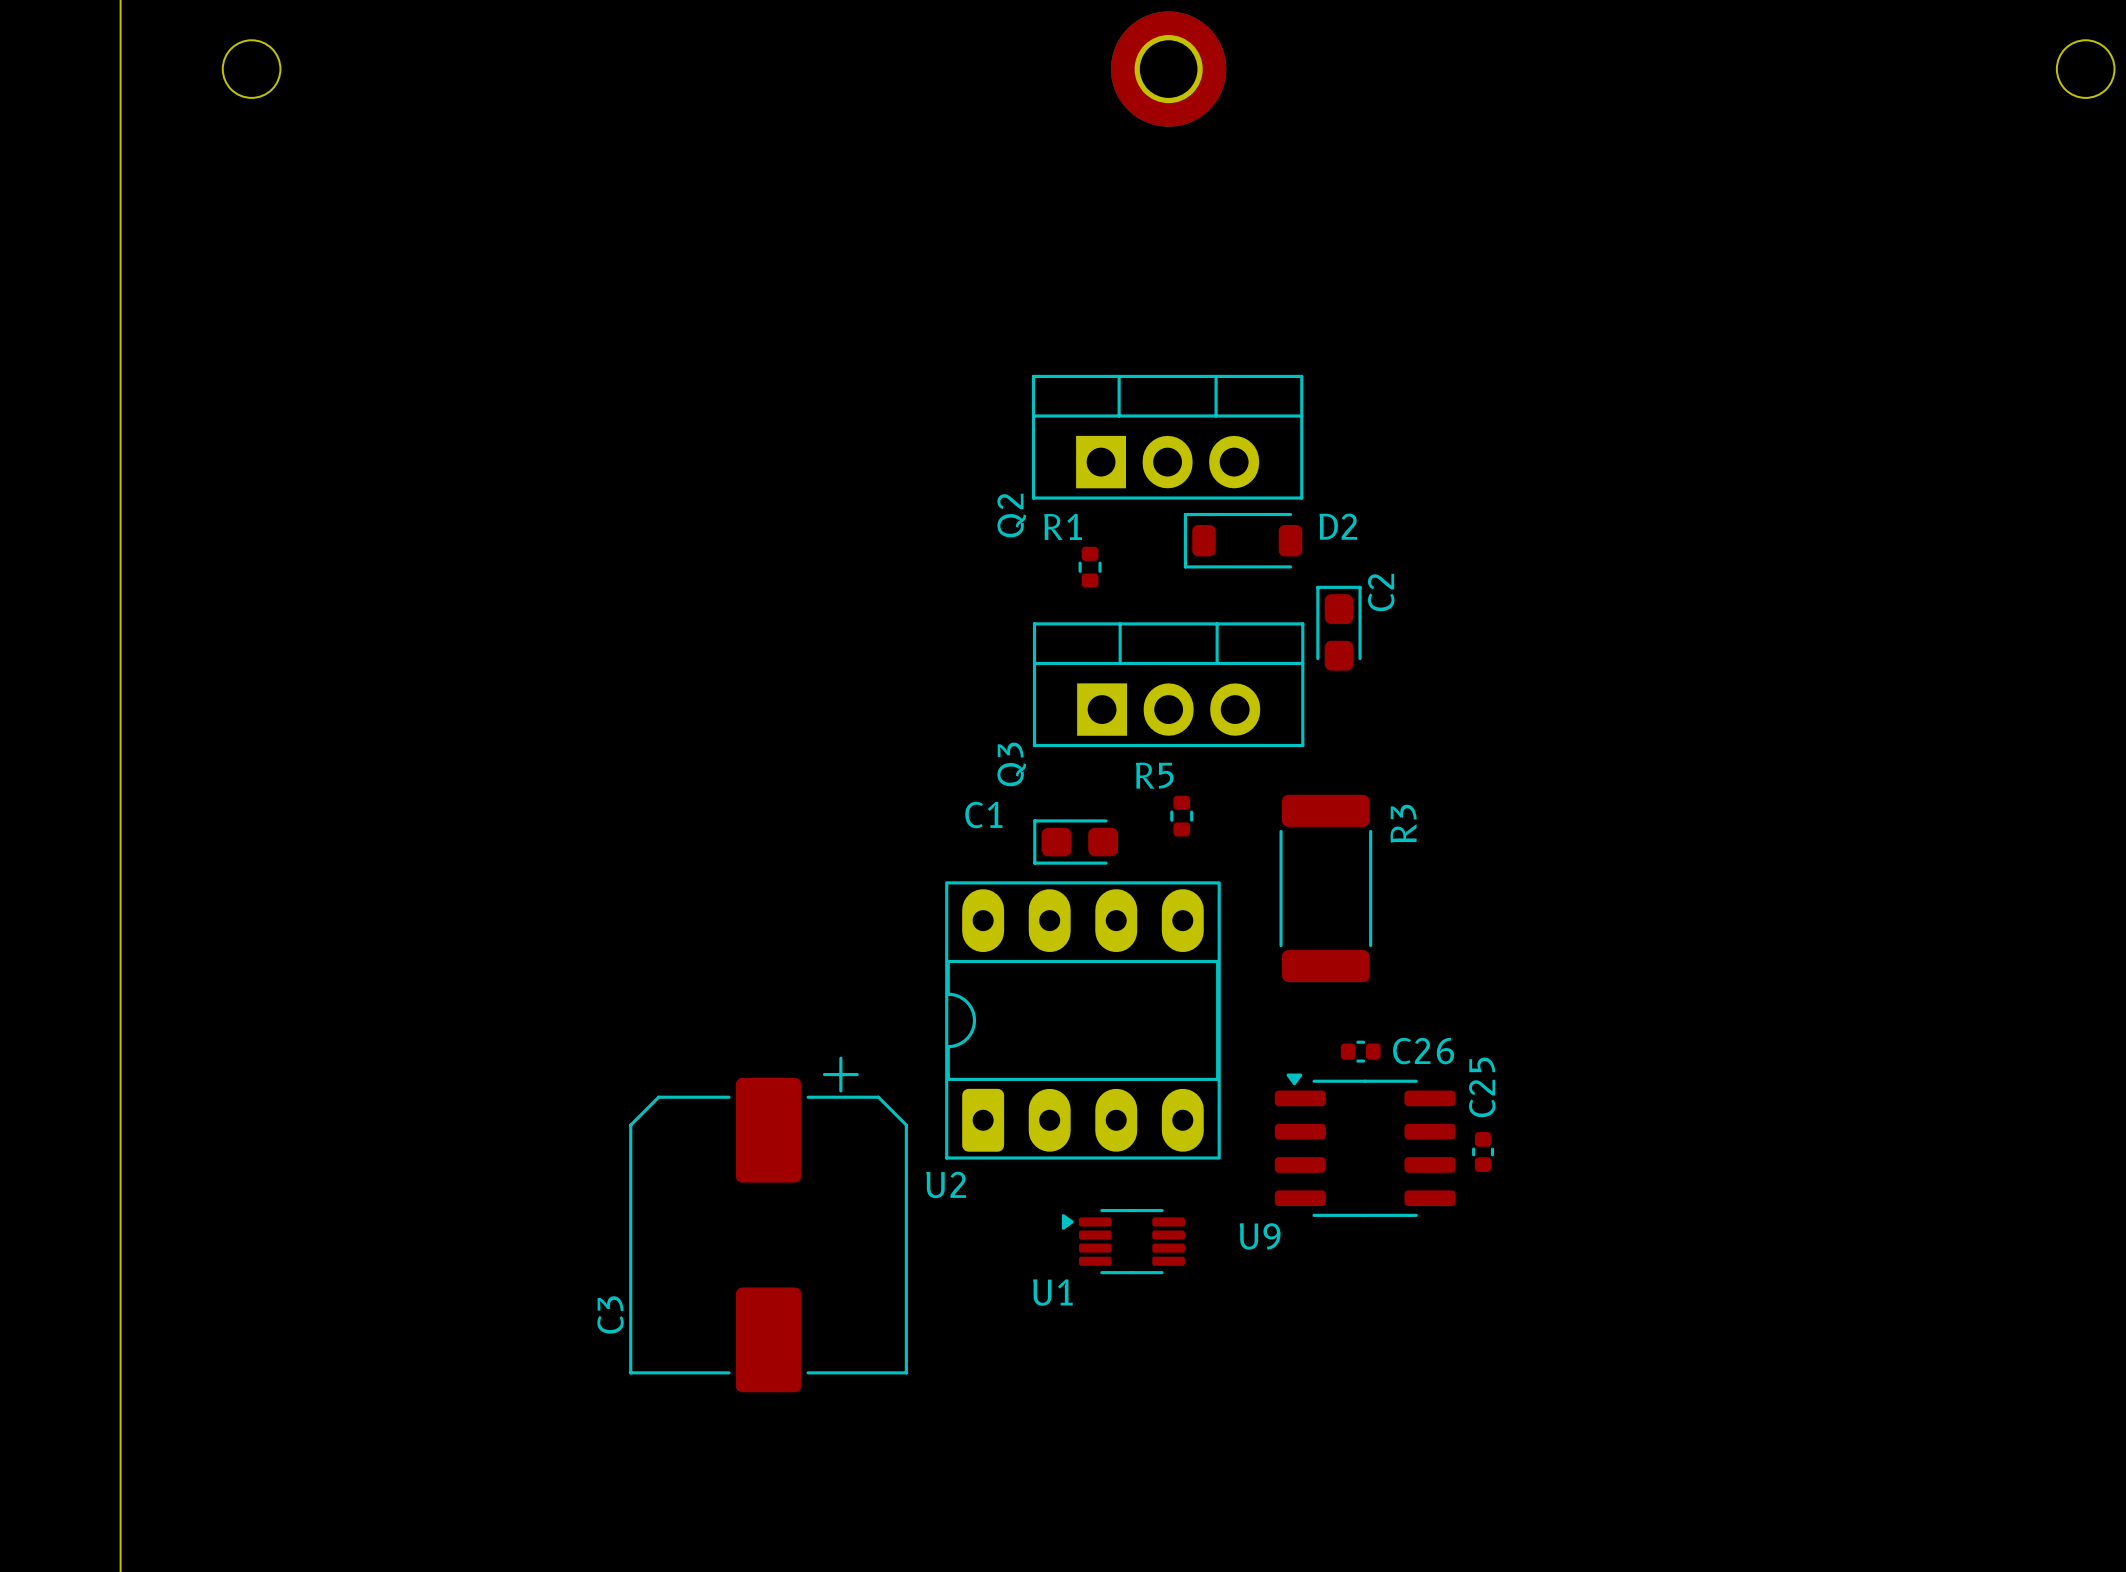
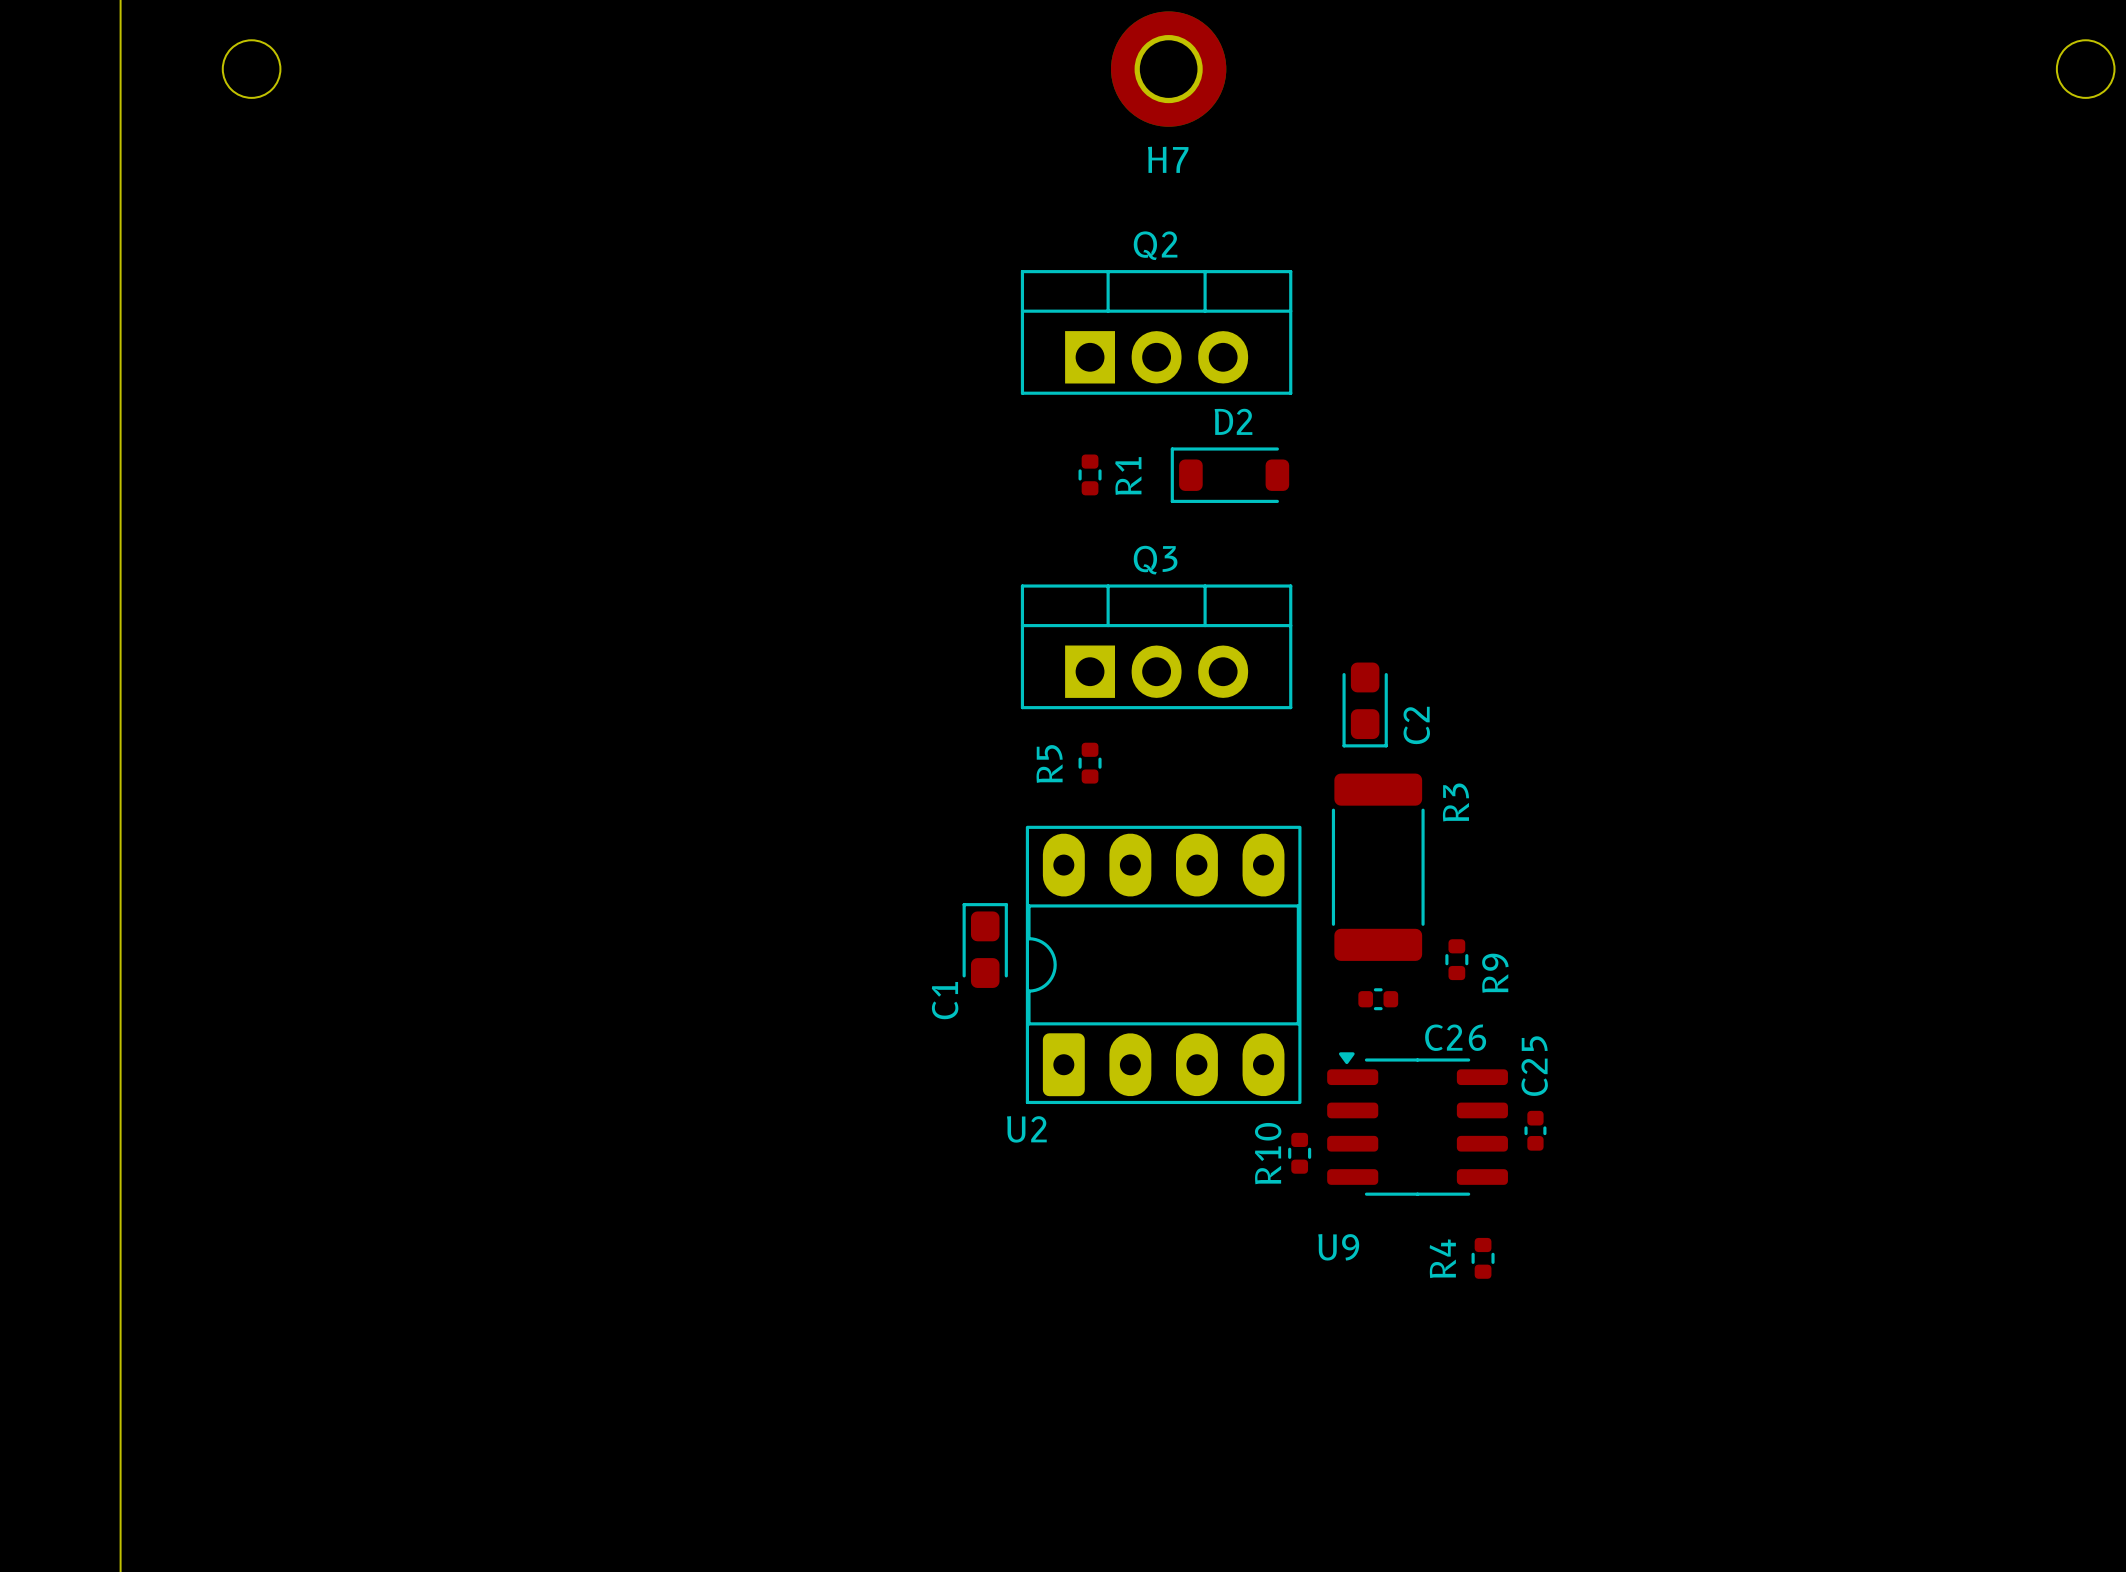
H7 name: none -> H7 (1168, 159)
Q2 position: (1167, 437) -> (1156, 332)
Q2 name rotation: 0° (1011, 515) -> 90° clockwise (1155, 245)
Q2 name position: Q2 (1011, 515) -> Q2 (1155, 245)
R1 name rotation: 0° (1063, 526) -> 90° counterclockwise (1128, 476)
R1 name position: R1 (1063, 526) -> R1 (1128, 476)
D2 name position: D2 (1338, 526) -> D2 (1233, 421)
D2 position: (1243, 540) -> (1229, 475)
R1 position: (1090, 567) -> (1090, 474)
C2 name position: C2 (1381, 592) -> C2 (1416, 725)
C2 rotation: 0° (1338, 628) -> 180° (1365, 704)
C2 position: (1338, 628) -> (1365, 704)
Q3 position: (1168, 684) -> (1156, 646)
Q3 name rotation: 0° (1011, 764) -> 90° clockwise (1155, 560)
Q3 name position: Q3 (1011, 764) -> Q3 (1155, 560)
R5 name rotation: 0° (1154, 775) -> 90° counterclockwise (1049, 763)
C1 name position: C1 (983, 814) -> C1 (945, 1000)
R5 position: (1181, 816) -> (1090, 763)
C1 rotation: 0° (1075, 842) -> 90° clockwise (985, 945)
C1 position: (1075, 842) -> (985, 945)
R3 position: (1325, 888) -> (1378, 867)
R9: none -> (1456, 959)
U2 position: (1082, 1020) -> (1163, 964)
C26 position: (1360, 1051) -> (1378, 999)
C26 name position: C26 (1423, 1051) -> C26 (1455, 1037)
U9 position: (1365, 1145) -> (1417, 1124)
C25 position: (1483, 1151) -> (1535, 1130)
R10: none -> (1299, 1153)
C3: (768, 1224) -> none
U9 name position: U9 (1260, 1236) -> U9 (1338, 1247)
U1: (1123, 1241) -> none
R4: none -> (1483, 1258)

